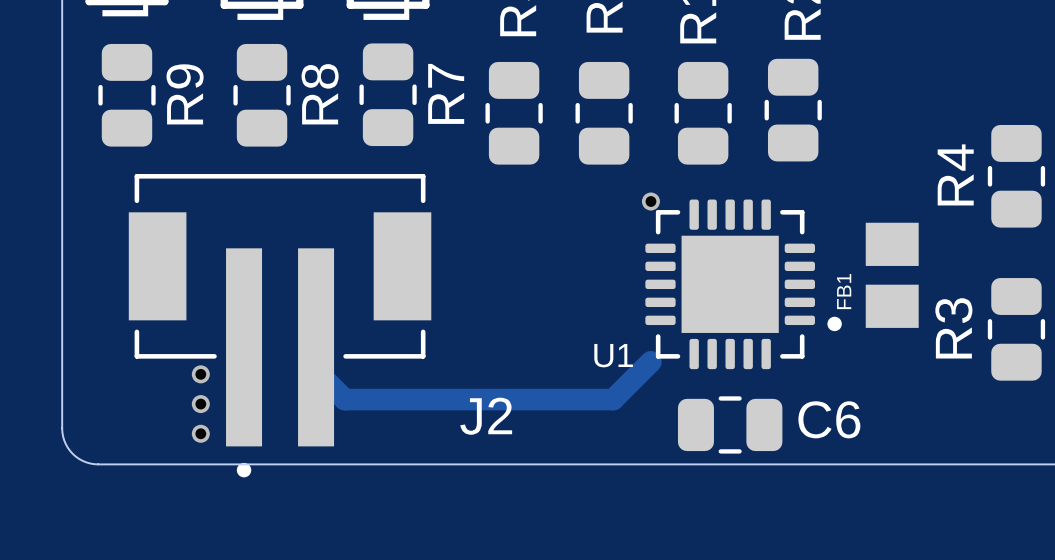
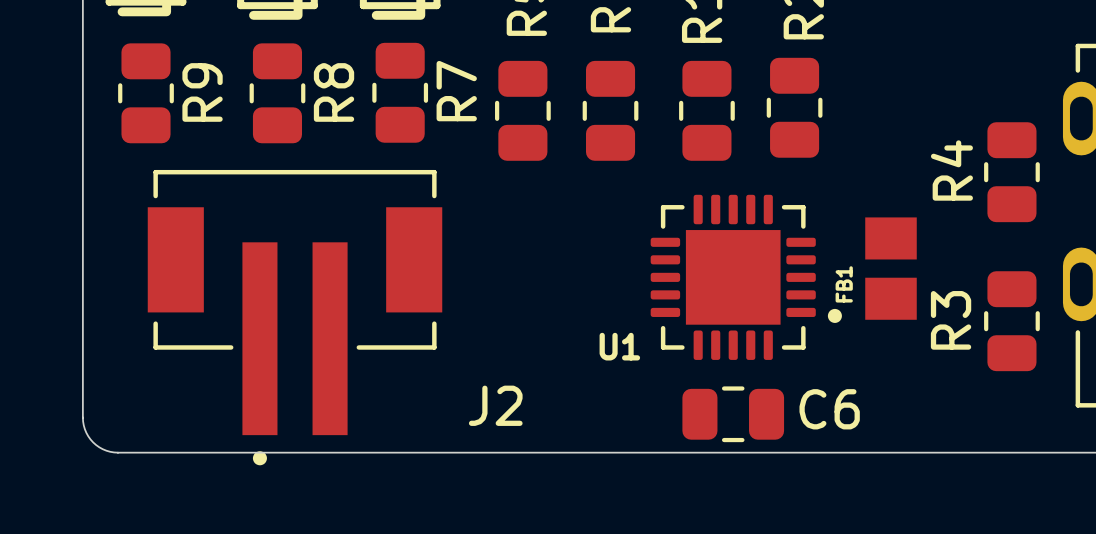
via: (650, 201) -> none
track: (316, 347) (316, 370) (344, 399) (613, 399) (650, 361) -> none
via: (200, 374) -> none
via: (200, 404) -> none
via: (200, 433) -> none

